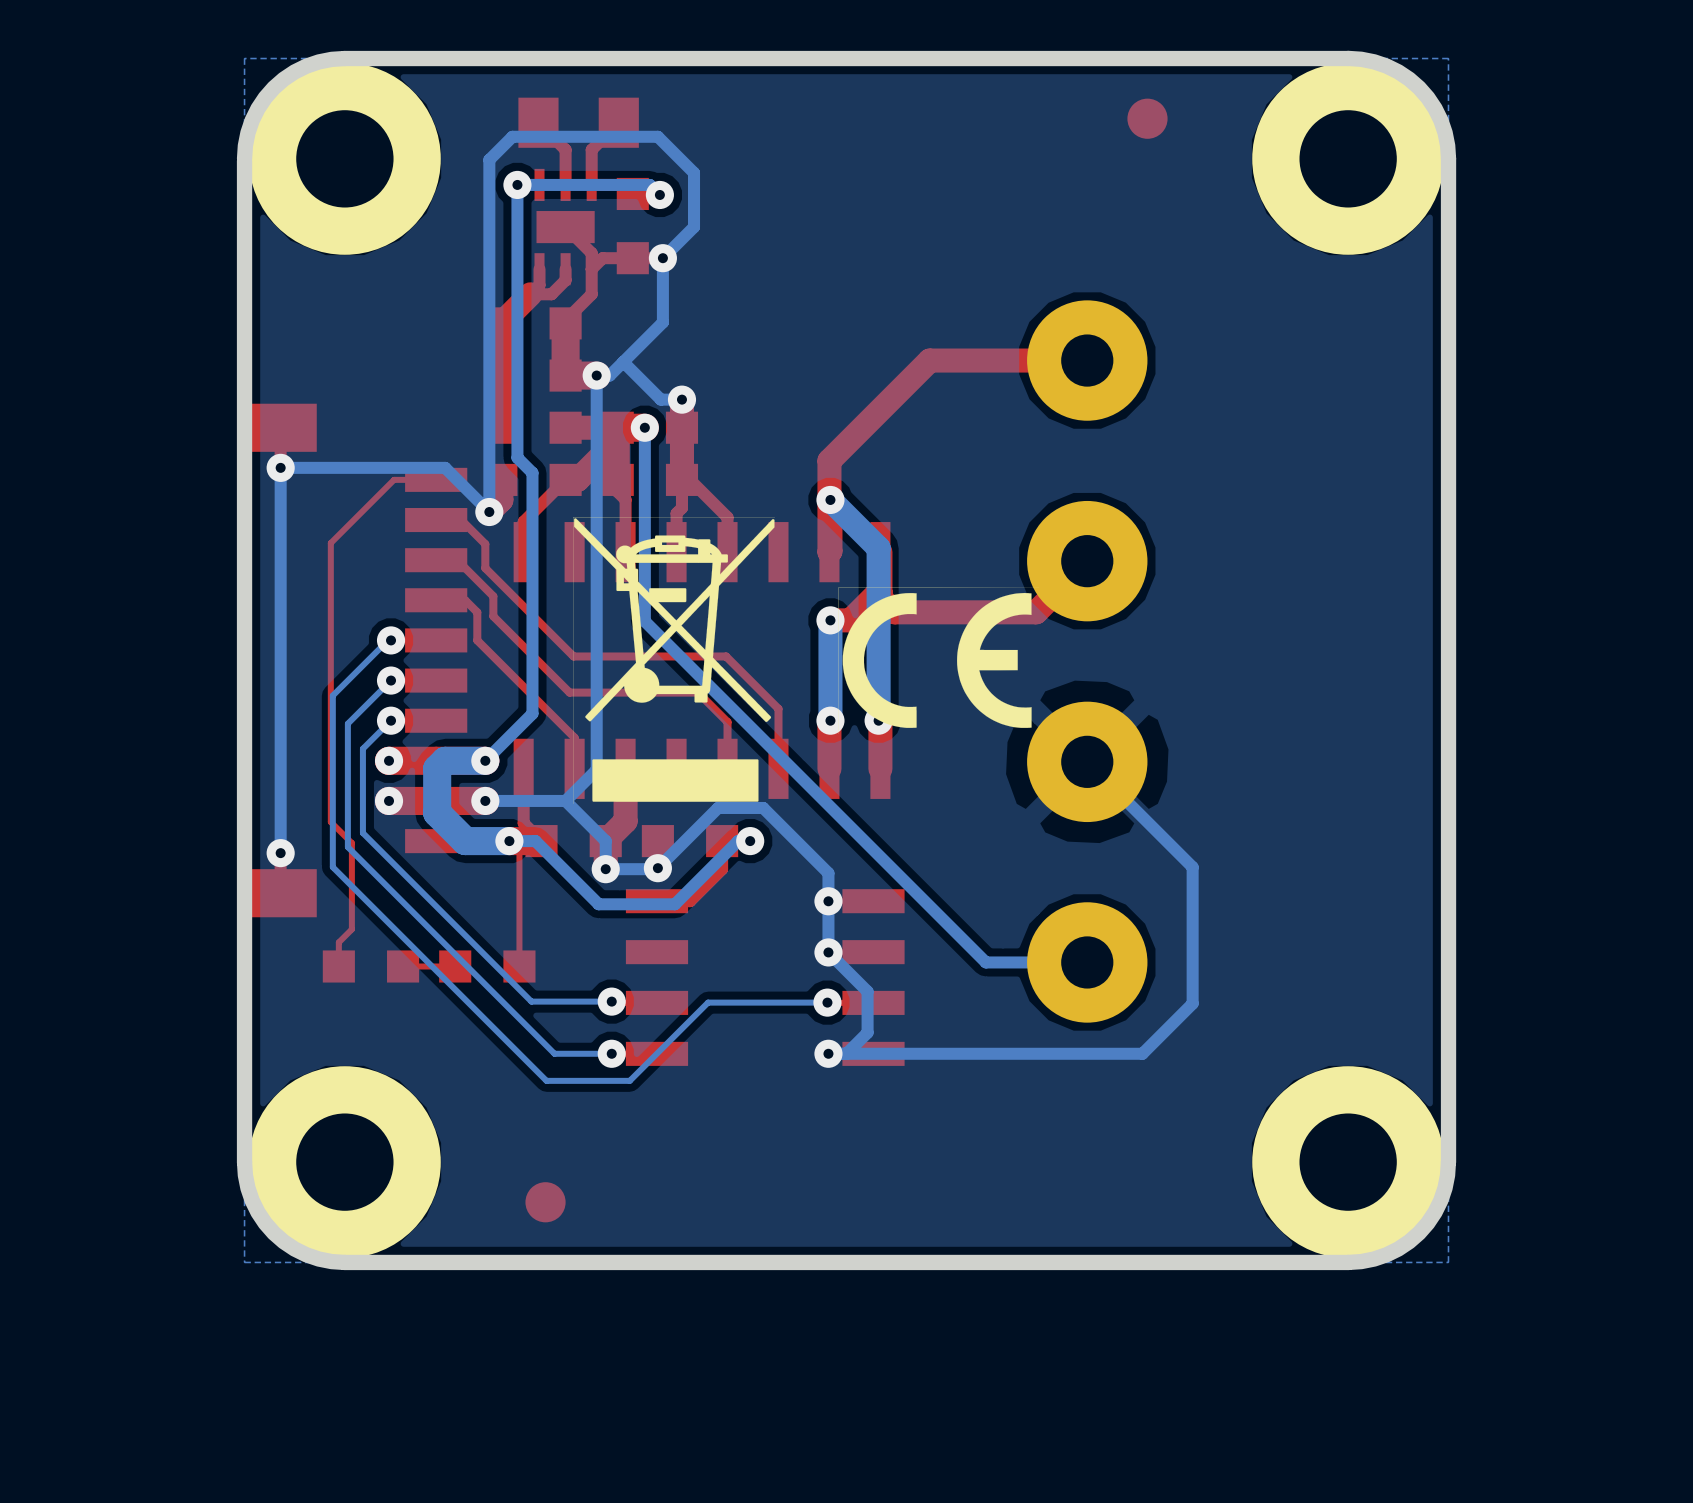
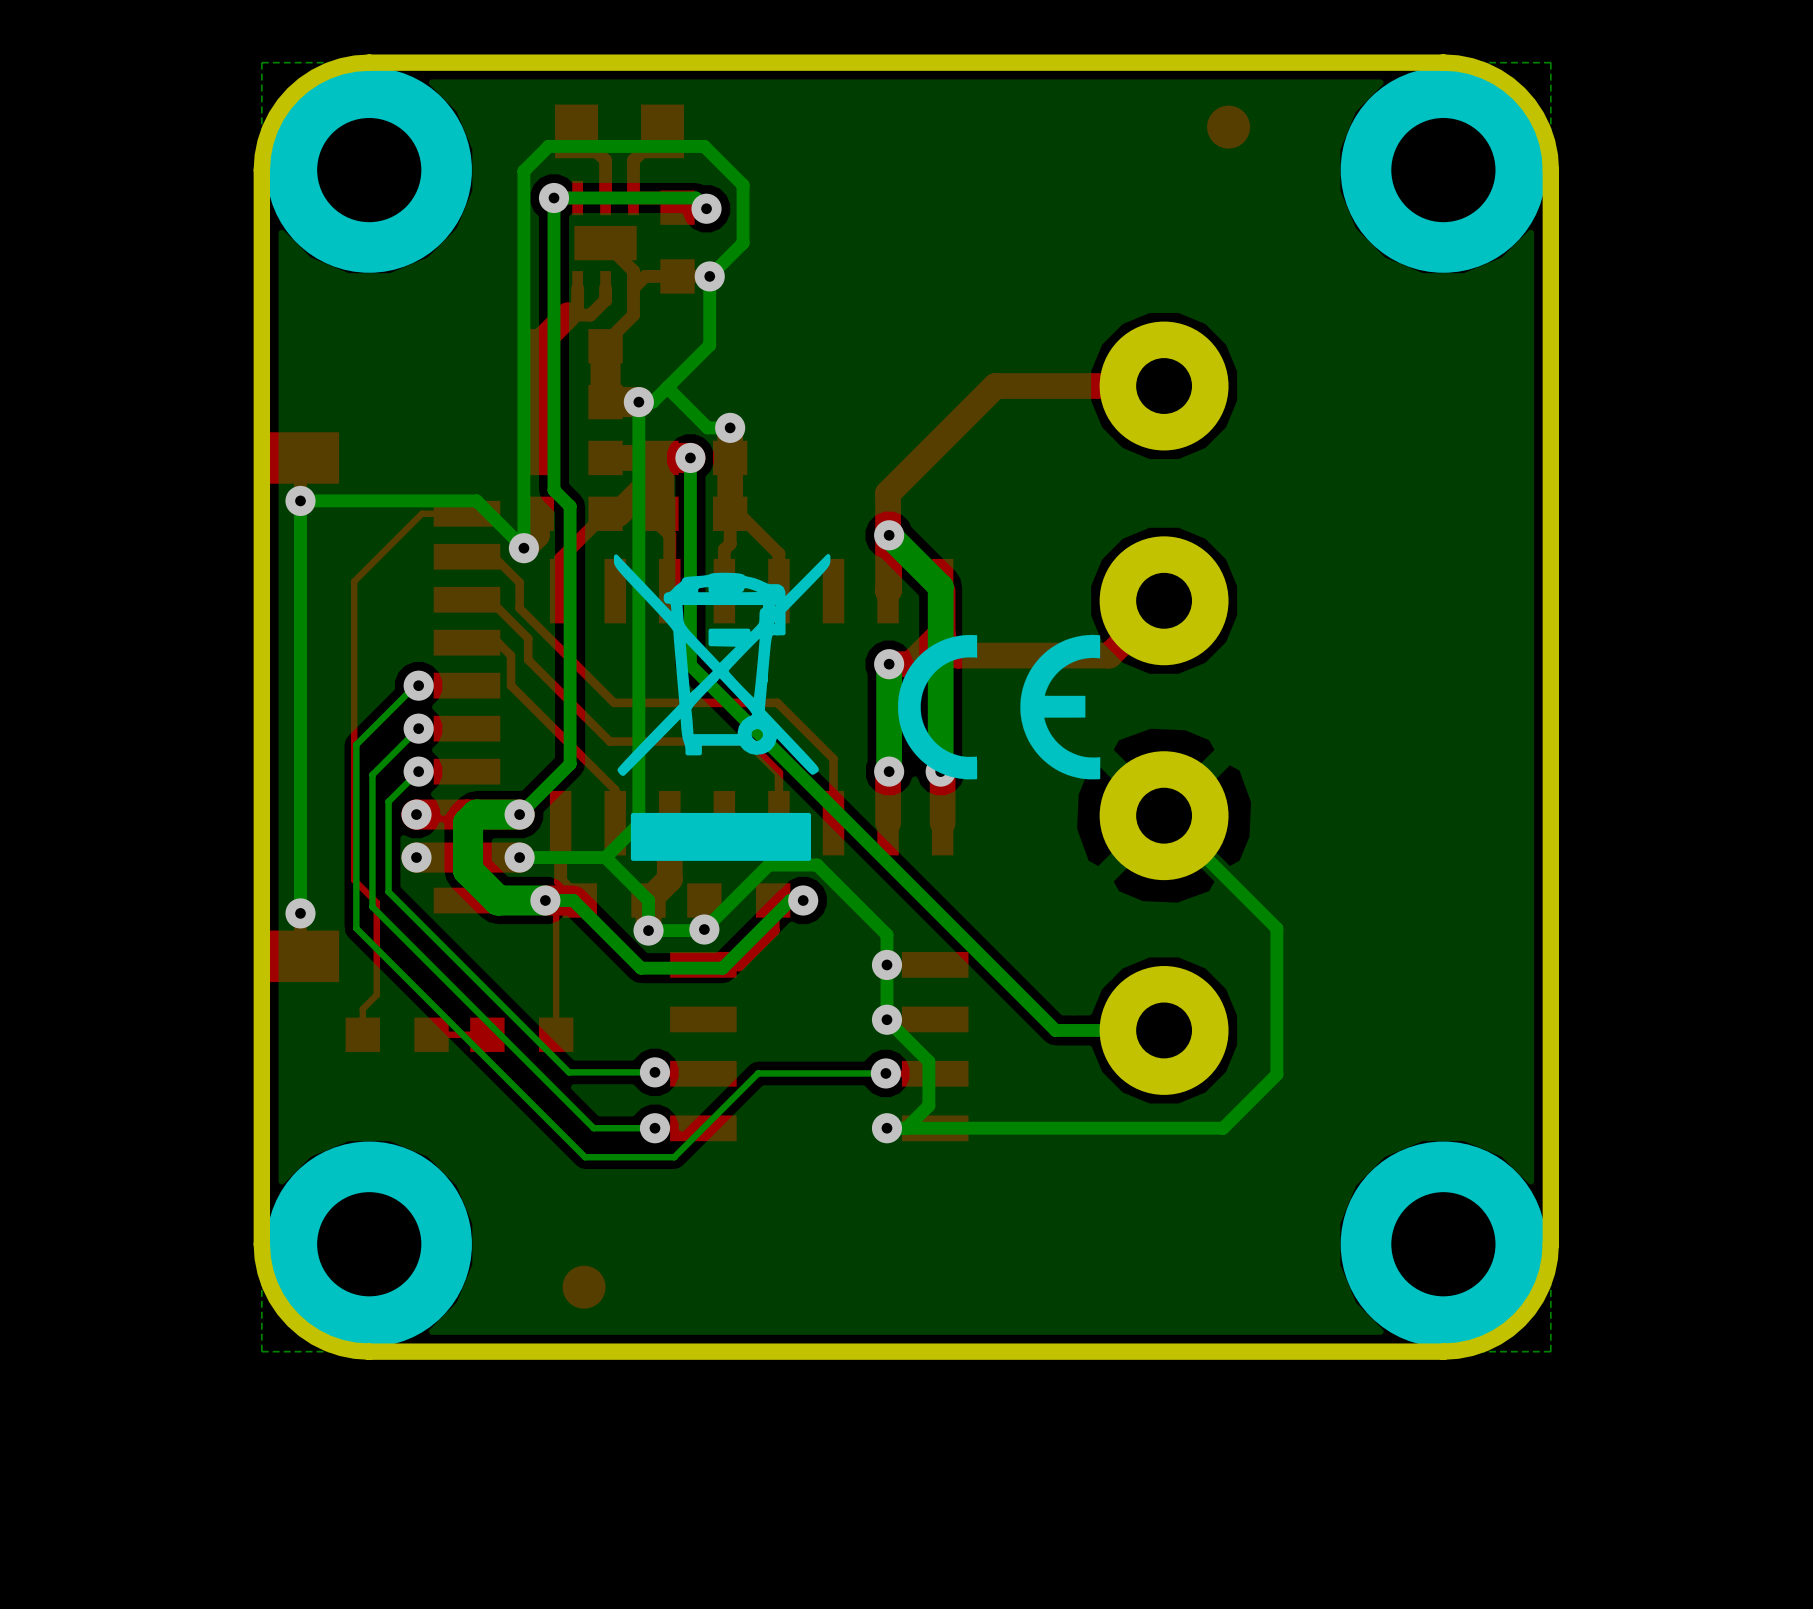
drawing shape: [573, 517, 775, 804] -> [613, 554, 831, 861]
drawing shape: [838, 587, 1040, 734] -> [897, 634, 1101, 780]

